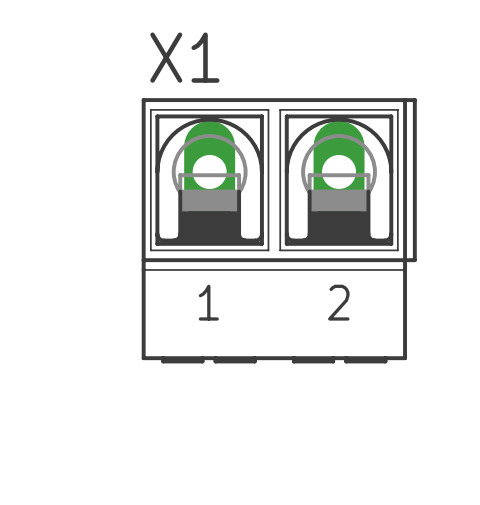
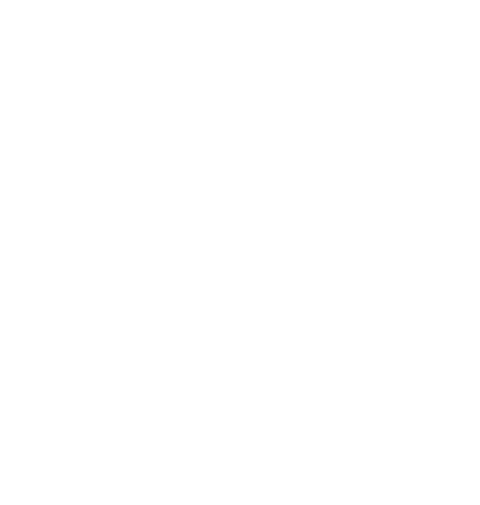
X1: (279, 230) -> none

